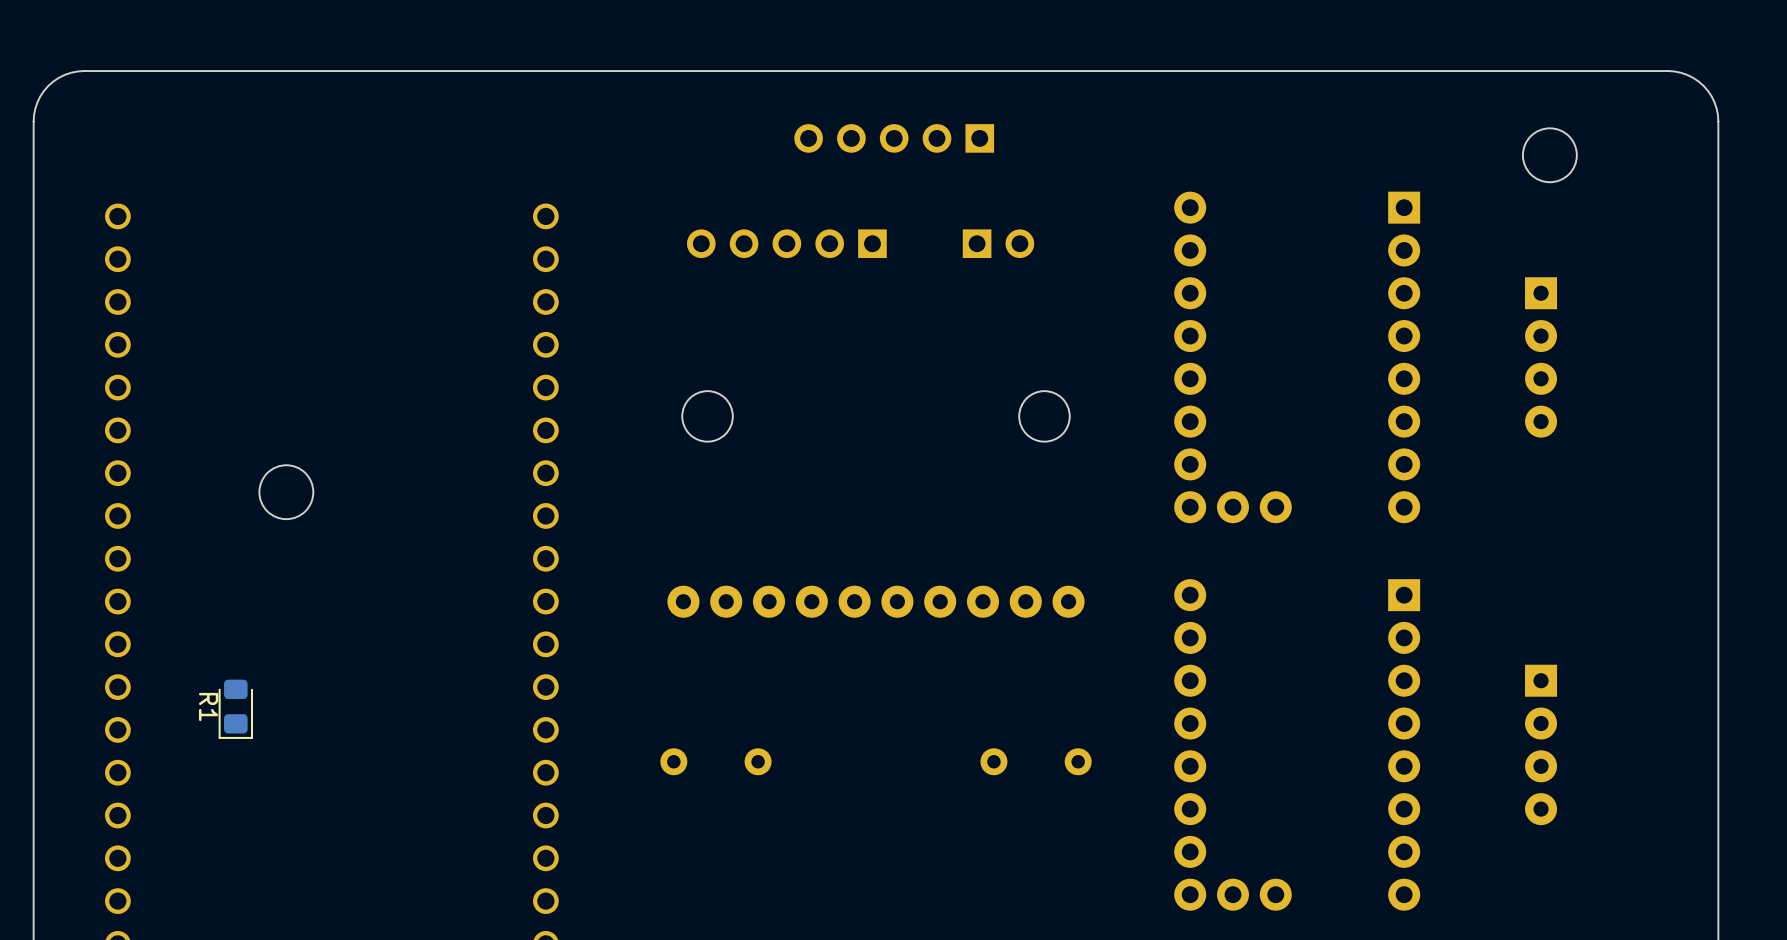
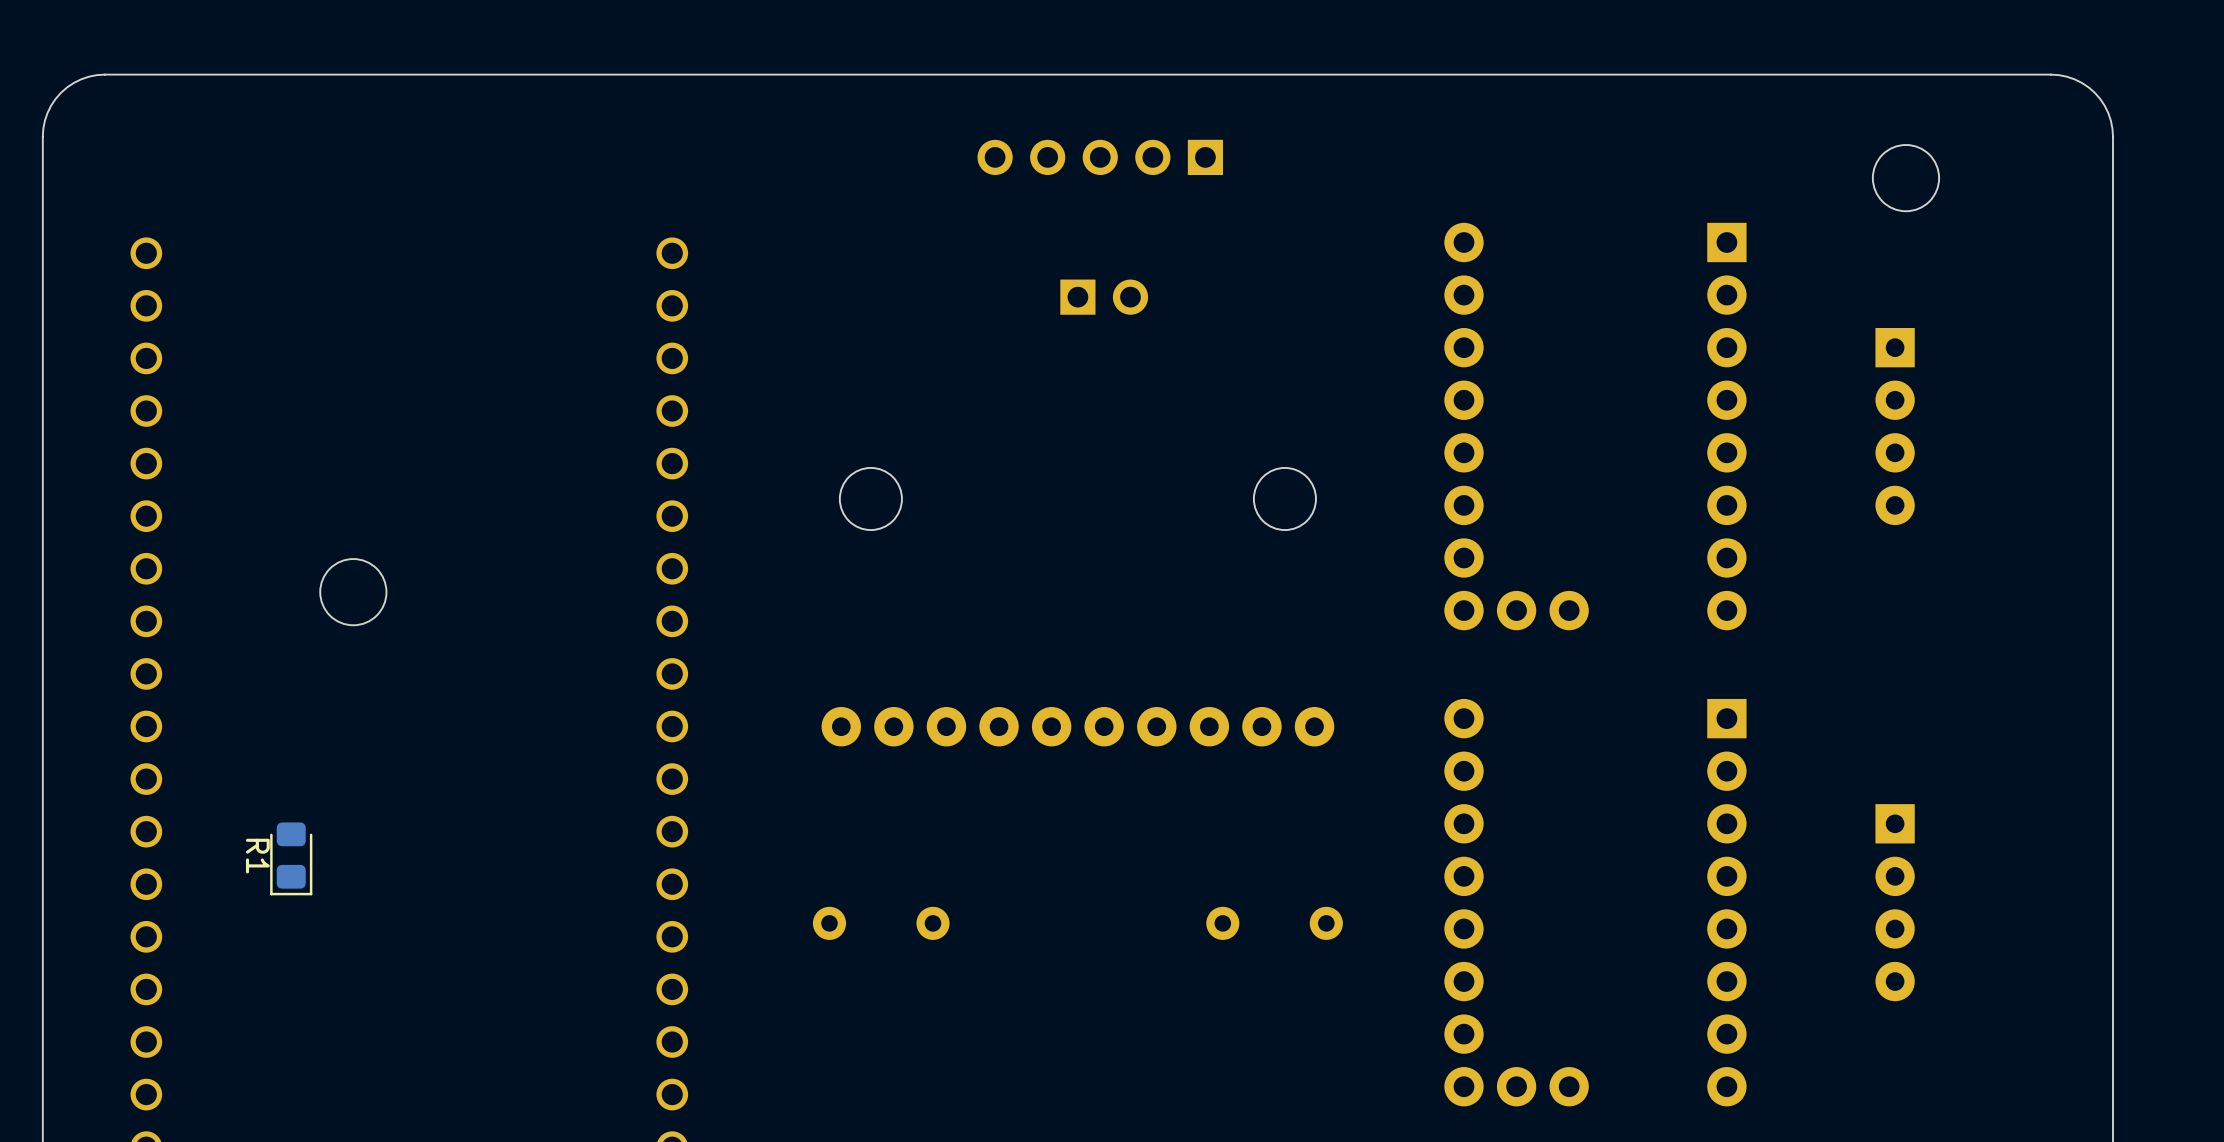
part: (786, 243) -> none
part position: (998, 243) -> (1104, 297)

